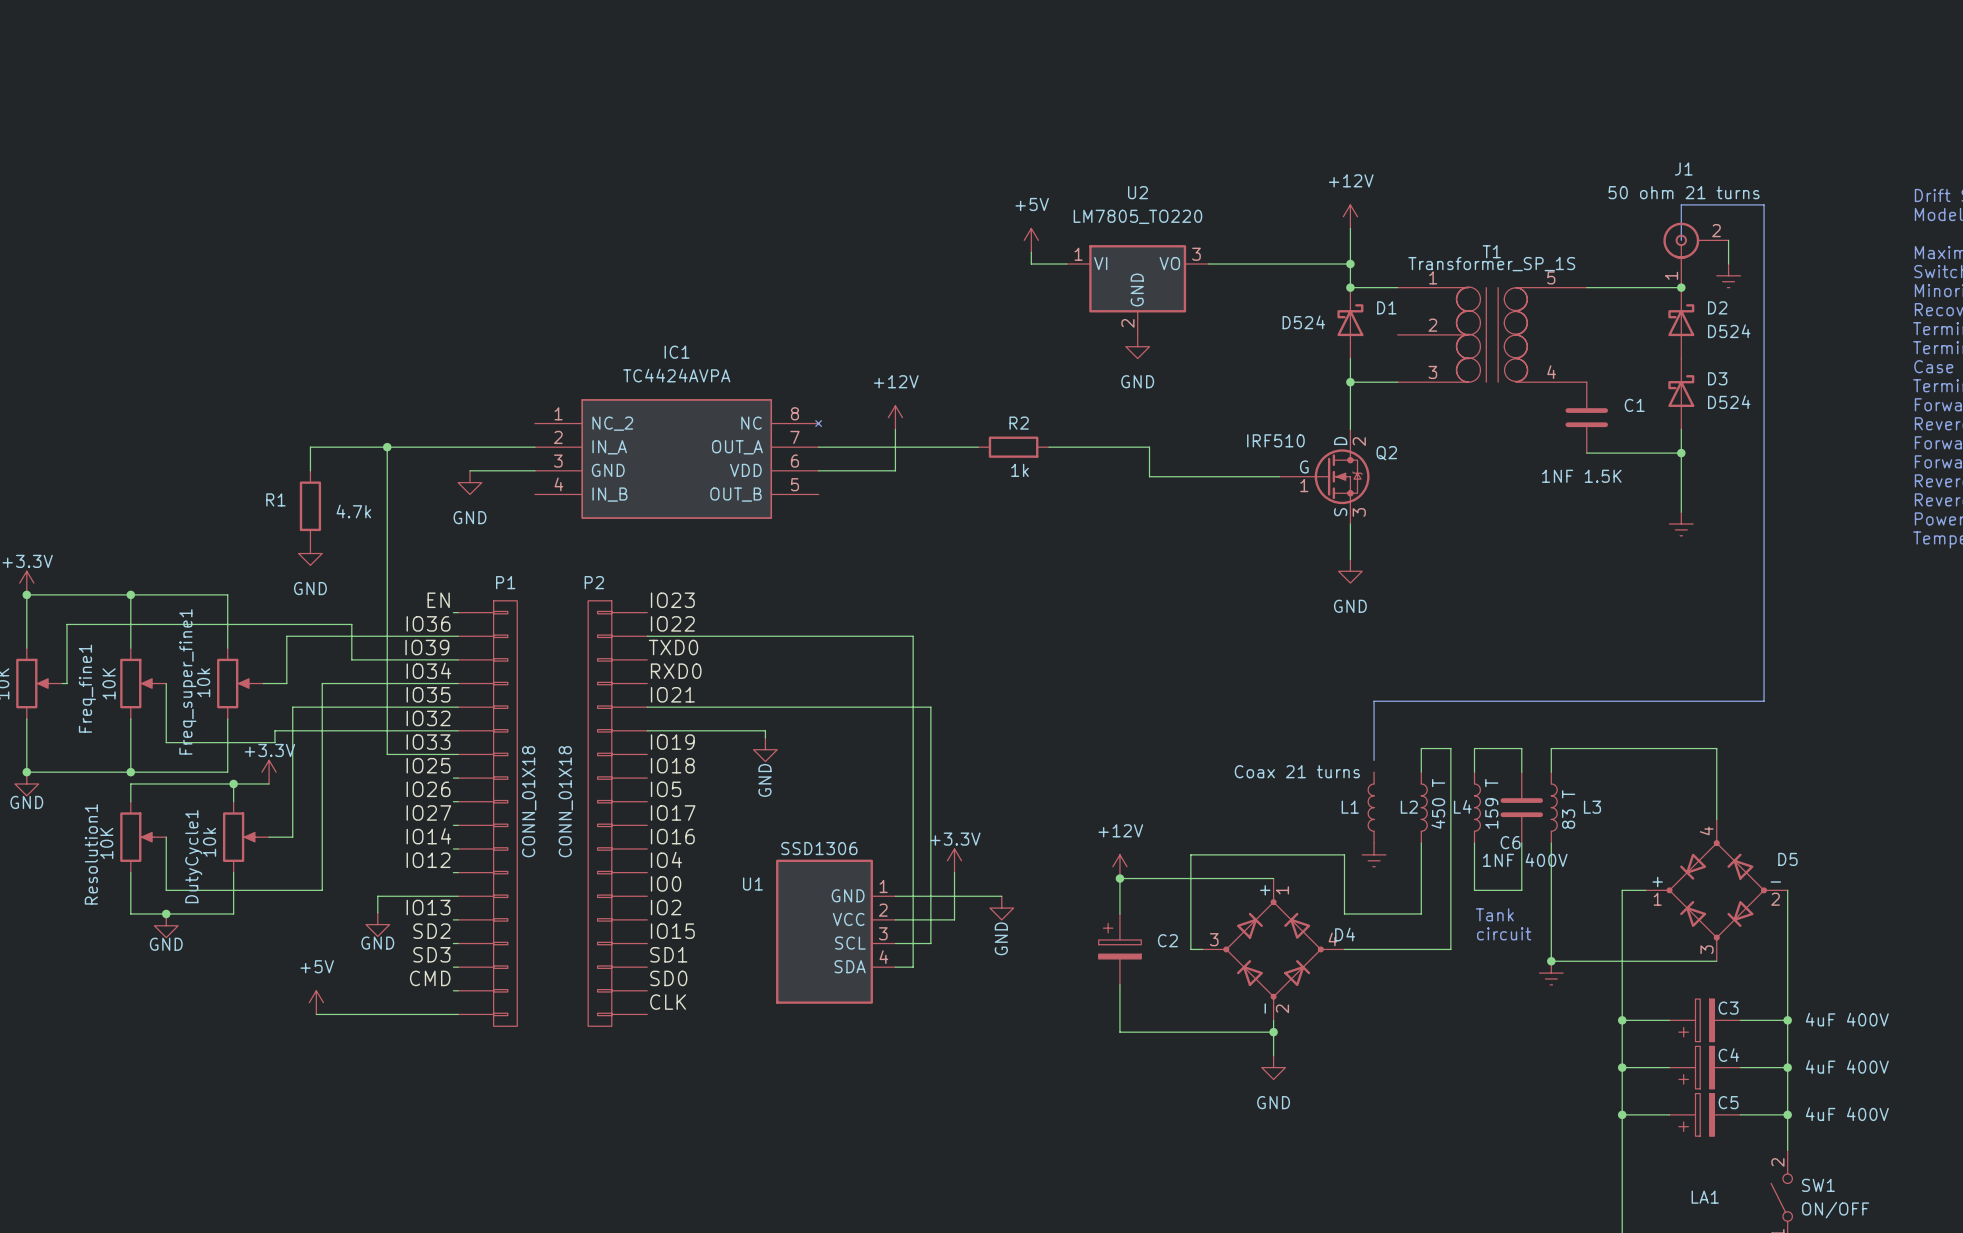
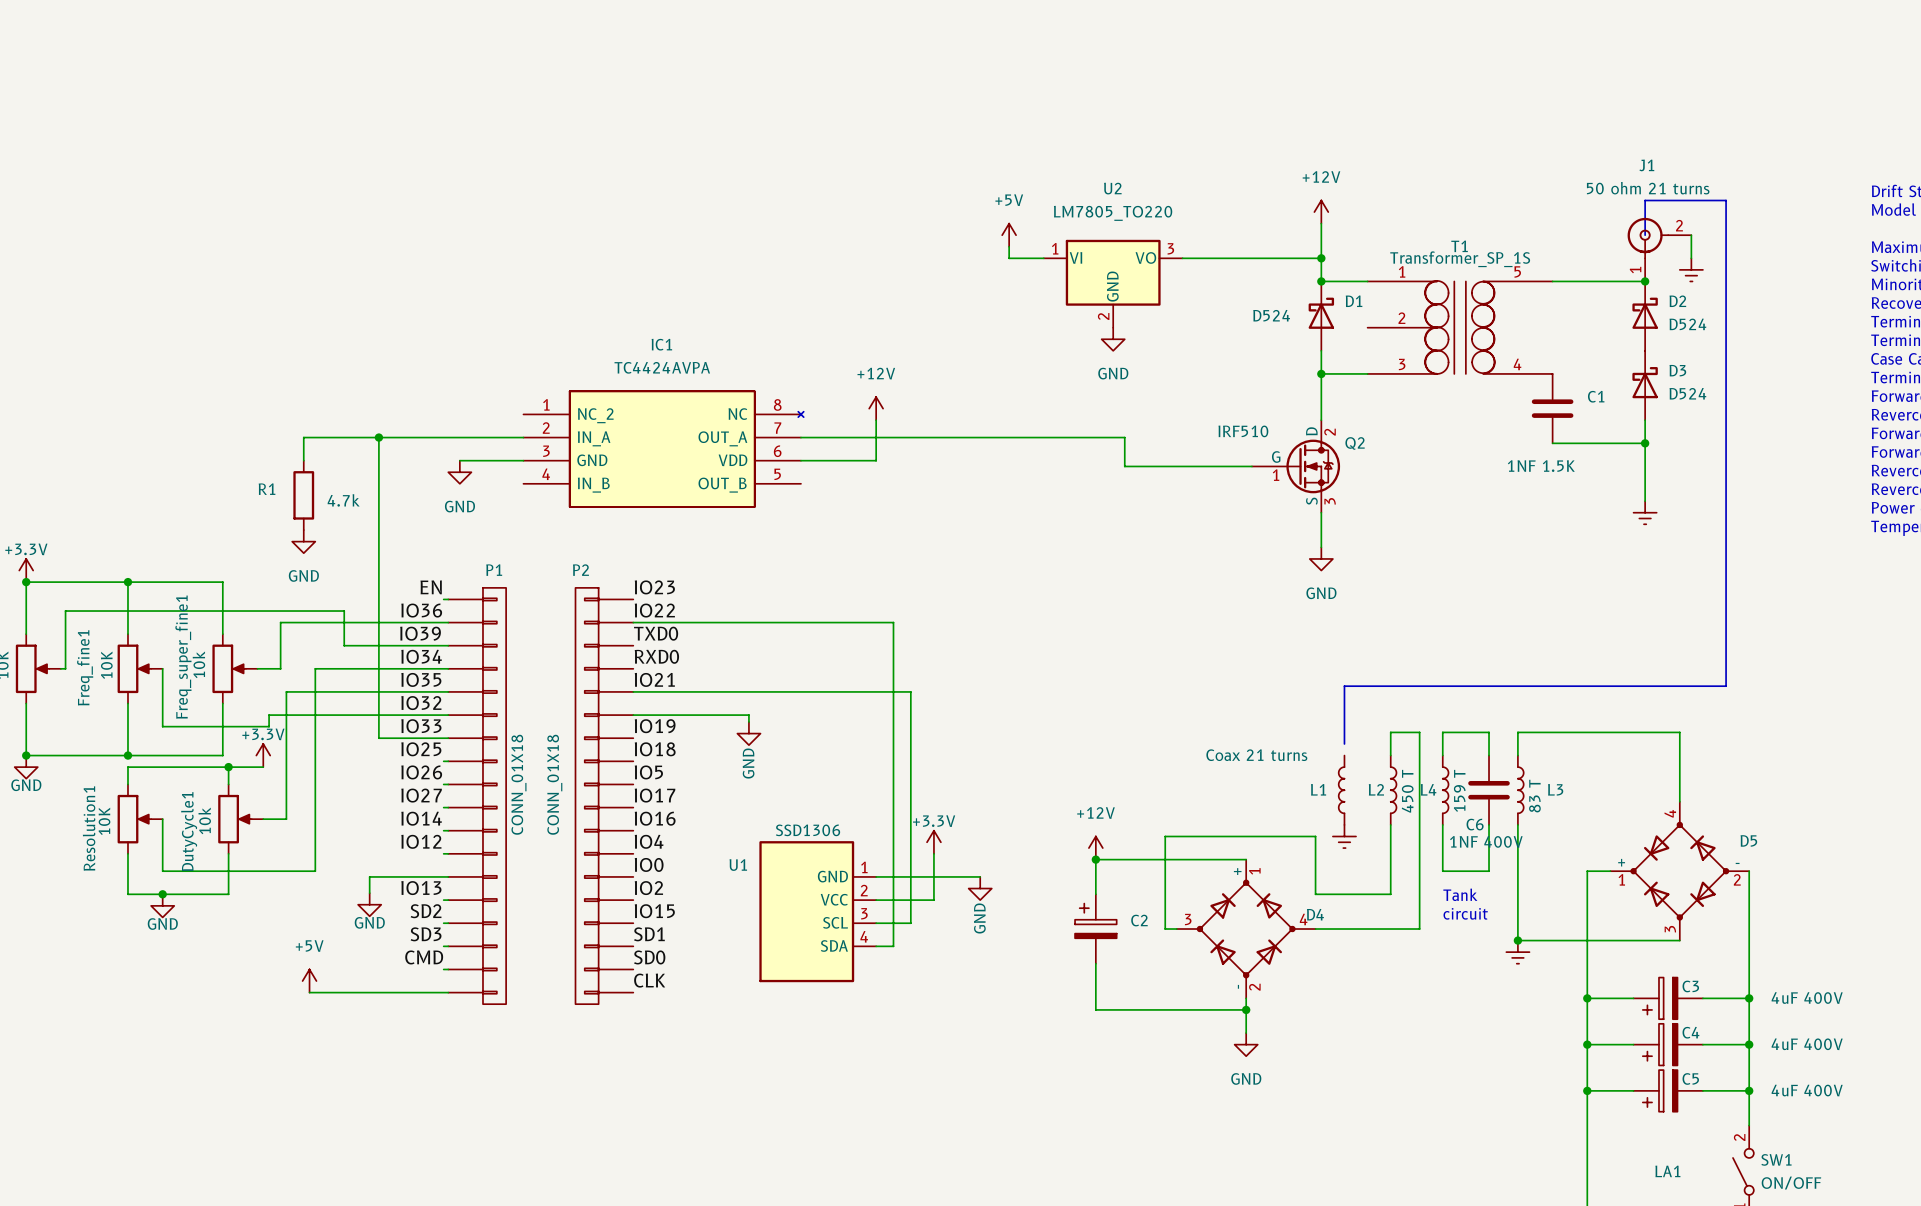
wire: none -> (957, 437) (1026, 437)
R2: 1k (1013, 447) -> none

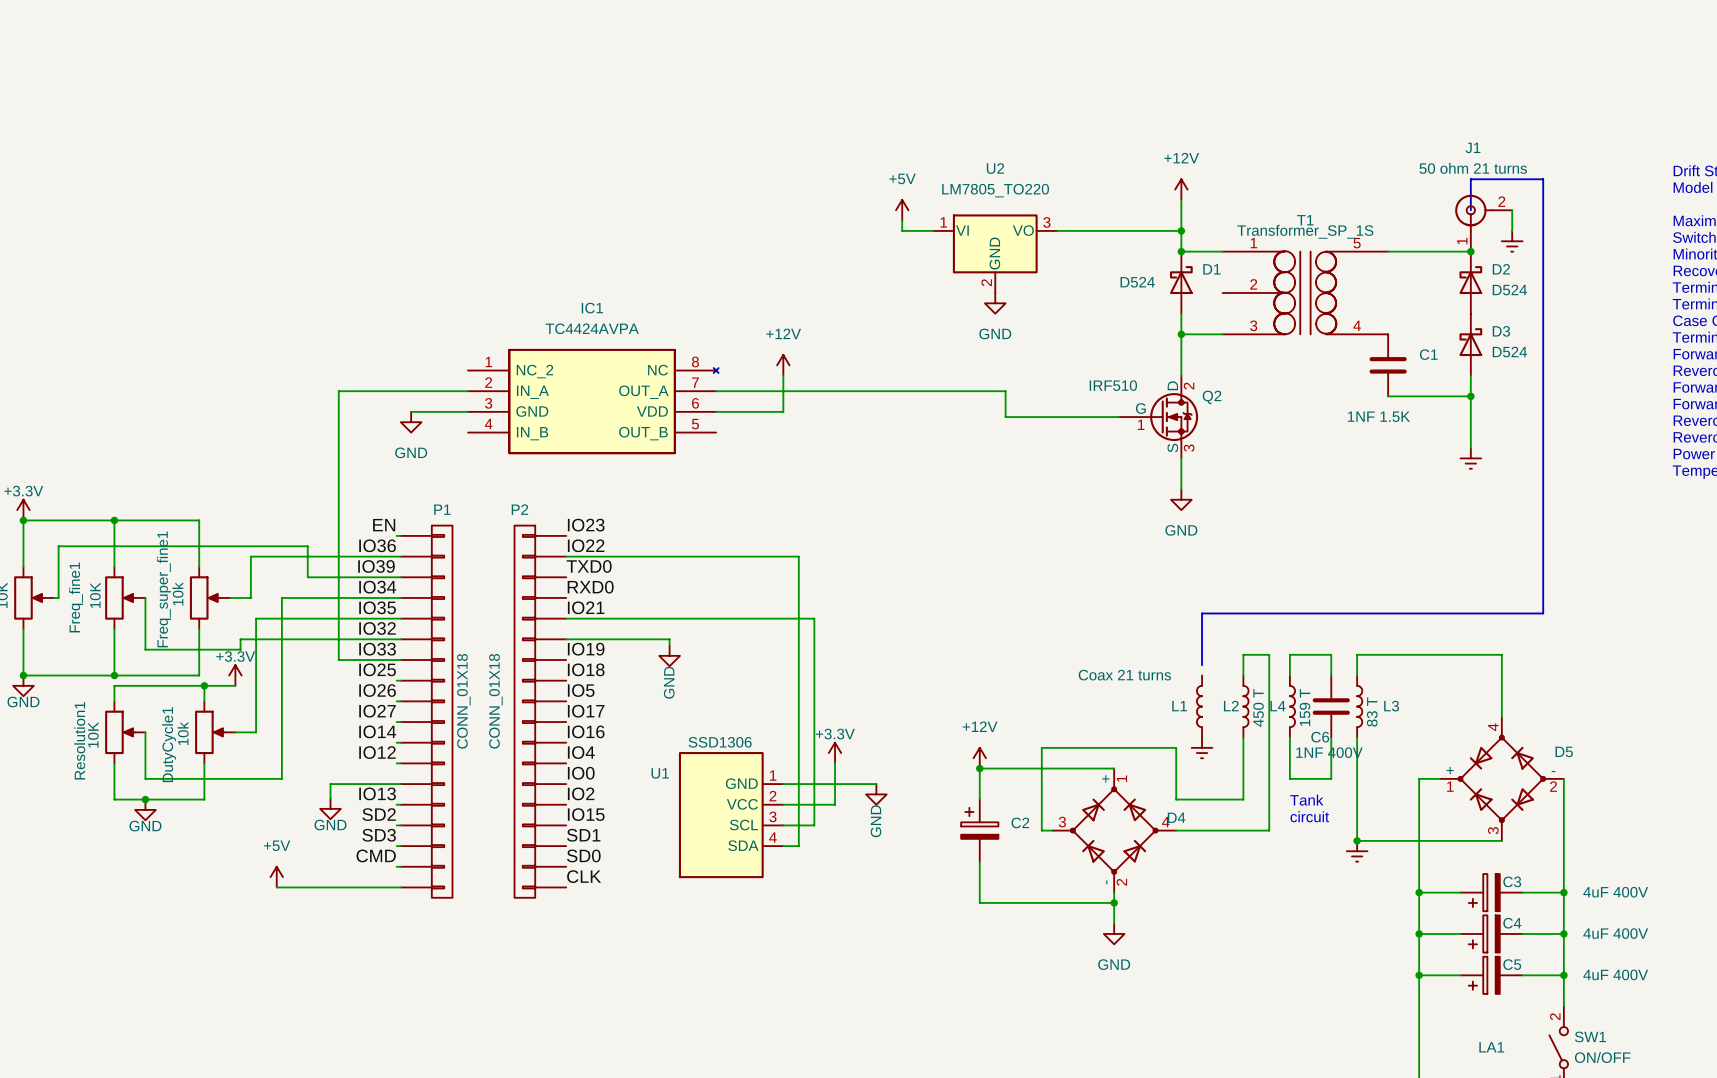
wire: (378, 437) (303, 437) (303, 460) -> none
junction: (378, 437) -> none
R1: 4.7k (303, 495) -> none
power symbol: GND (303, 541) -> none

